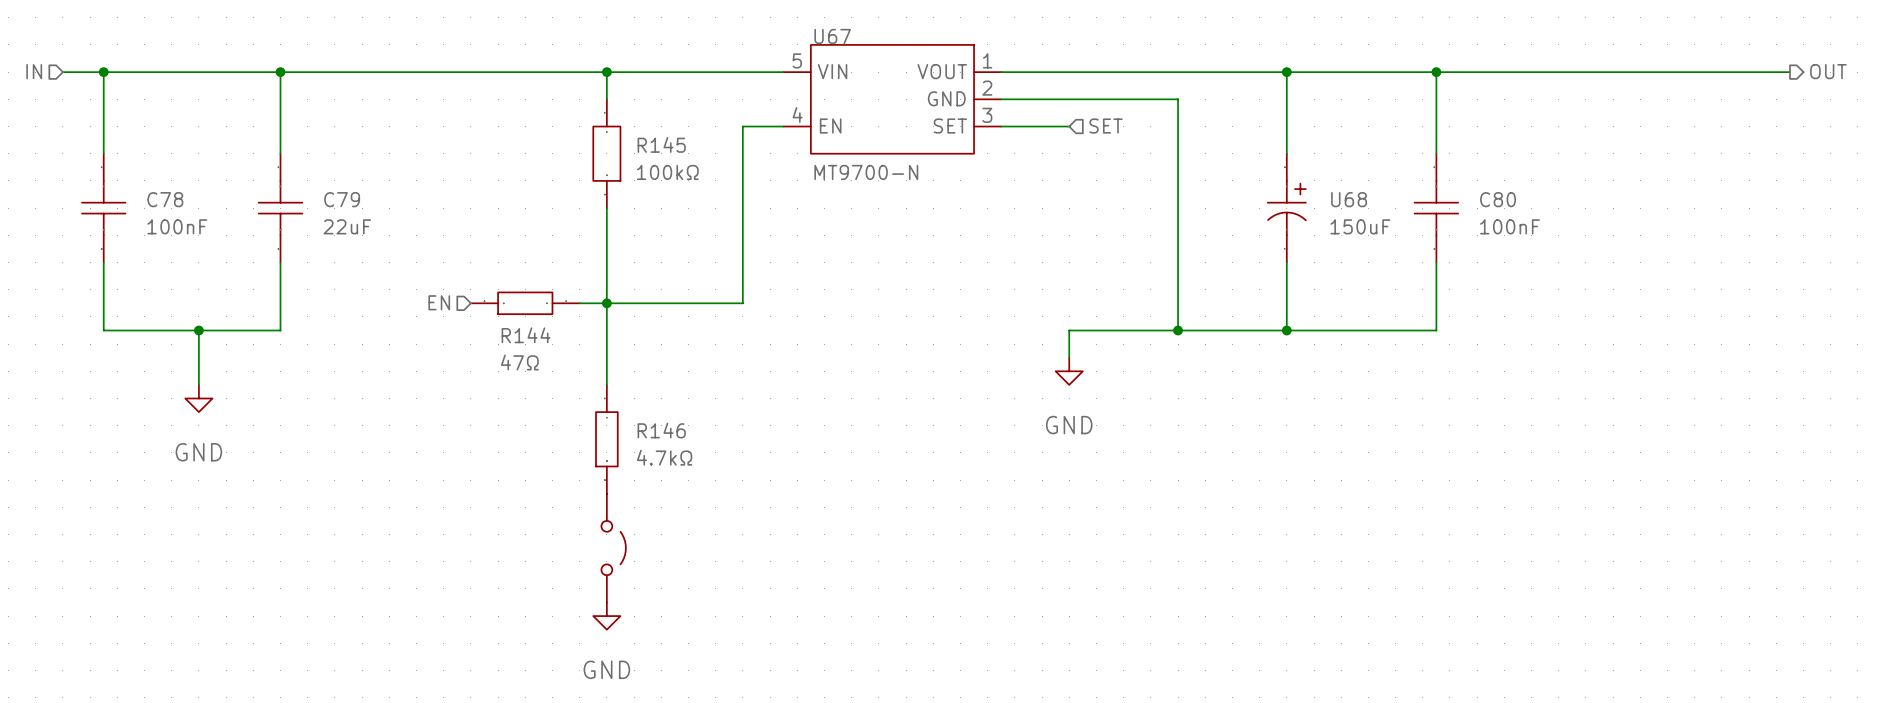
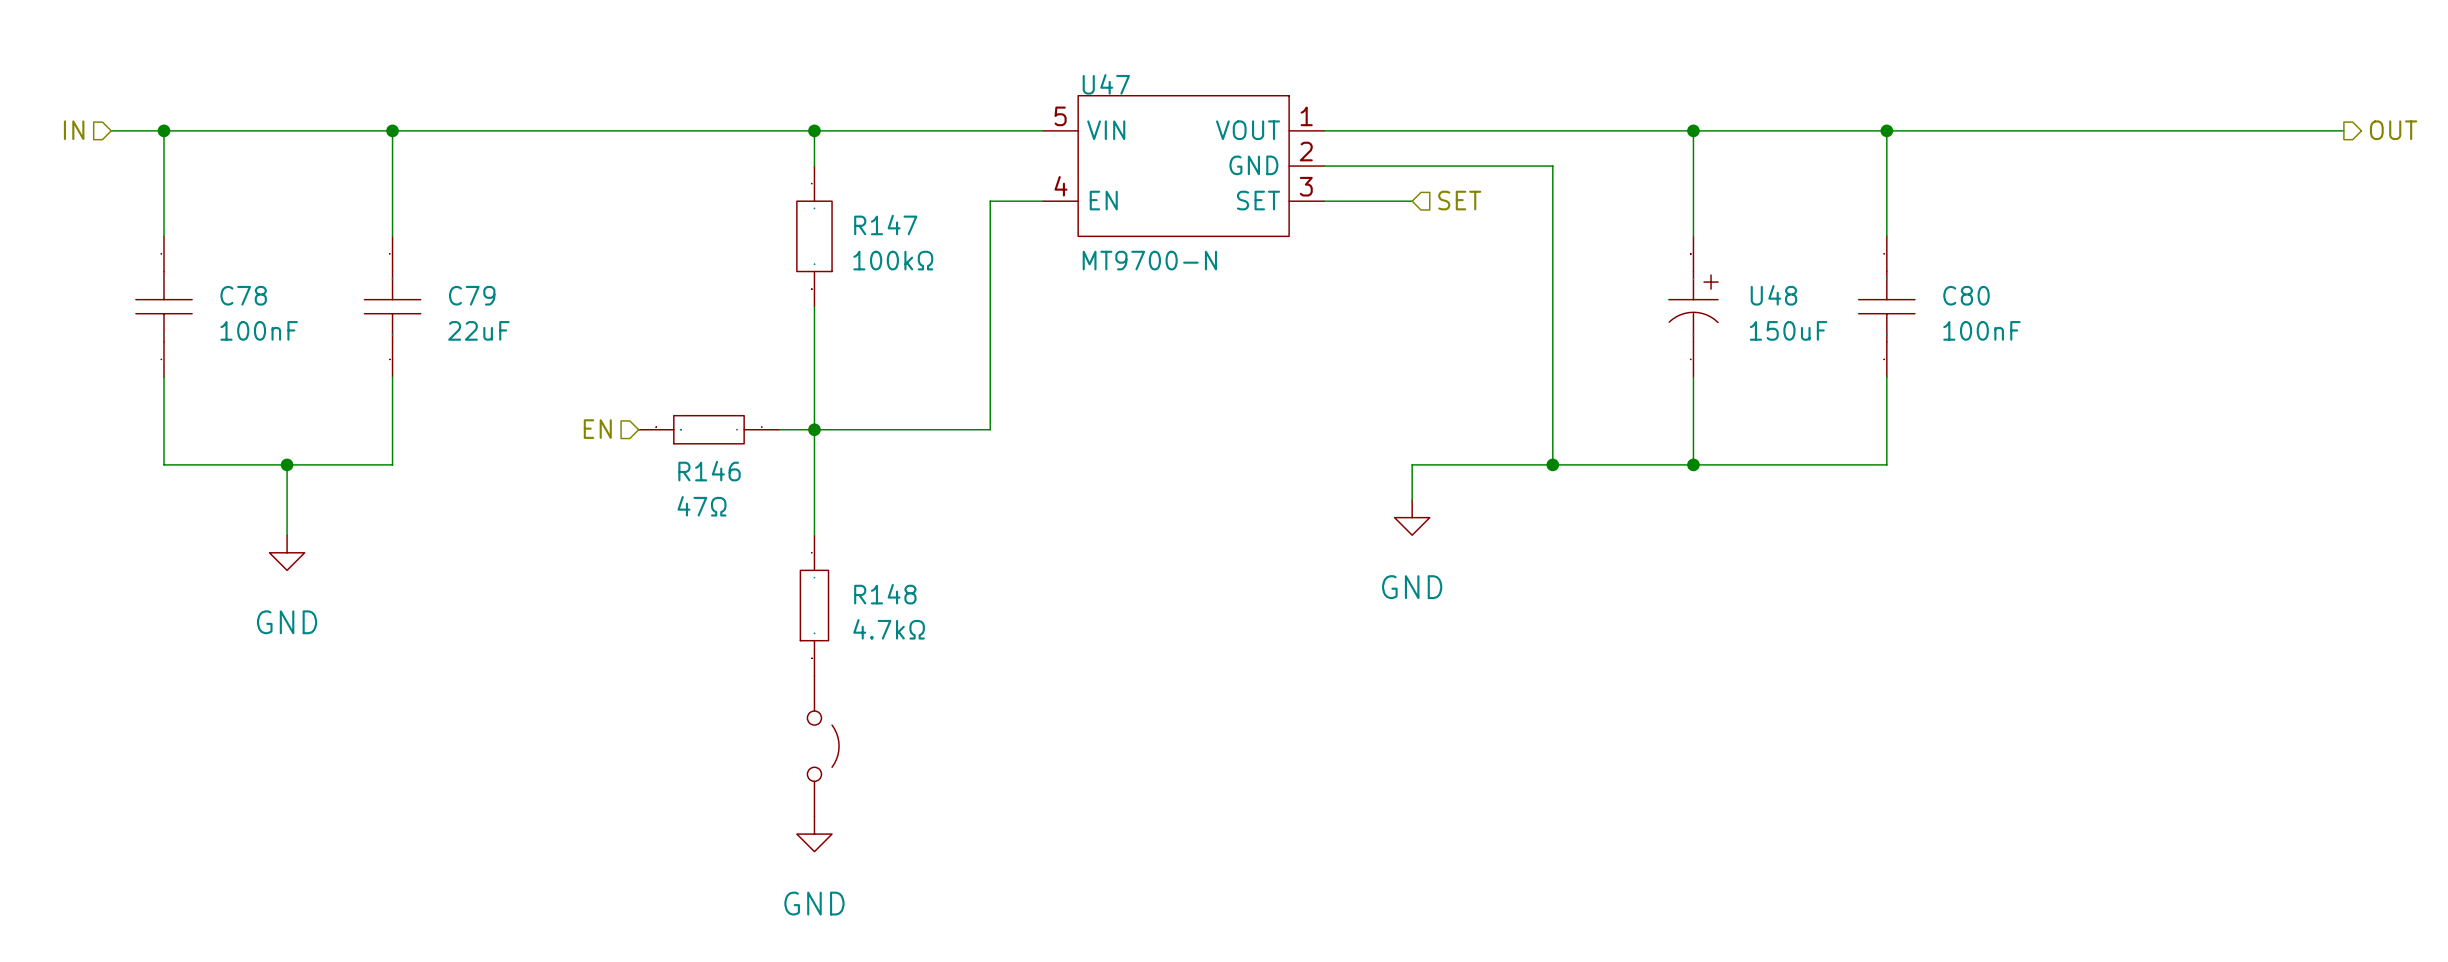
U67 name: U67 (832, 36) -> U47 (1106, 84)
R145 name: R145 (661, 144) -> R147 (885, 225)
U68 name: U68 (1349, 199) -> U48 (1773, 295)
R144 name: R144 (526, 335) -> R146 (709, 471)
R146 name: R146 (661, 430) -> R148 (885, 594)

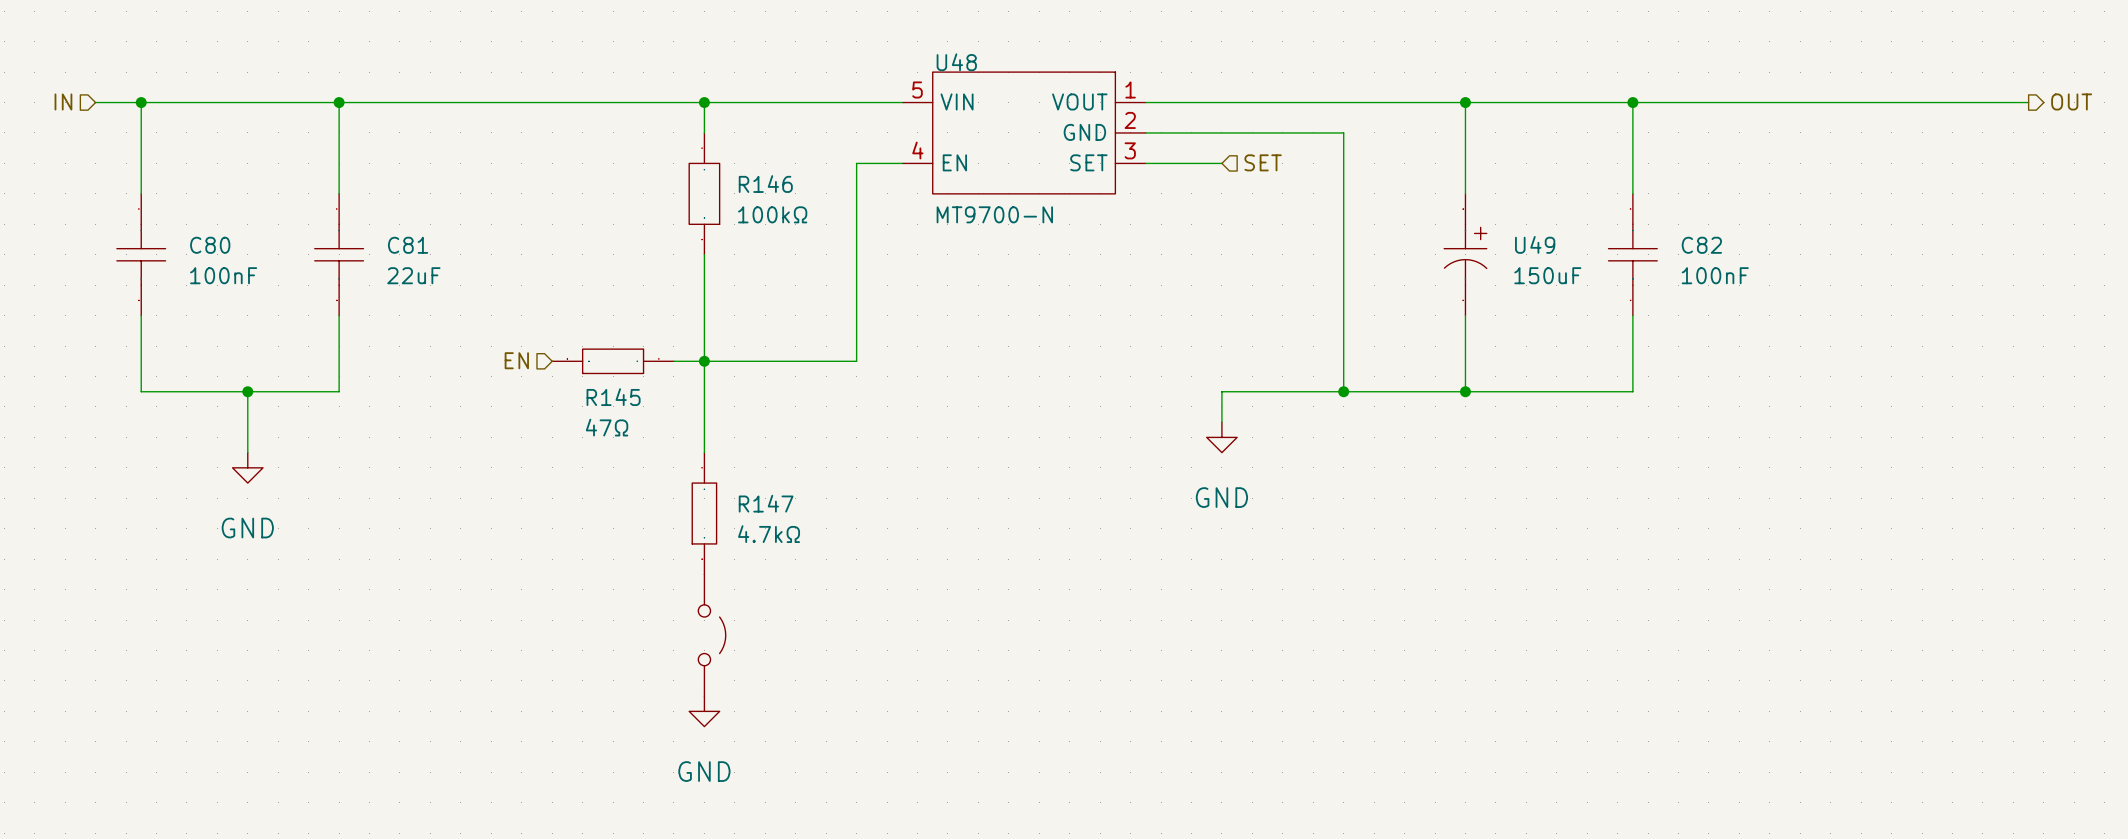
U47 name: U47 (1106, 84) -> U48 (956, 62)
R147 name: R147 (885, 225) -> R146 (765, 184)
C78 name: C78 (243, 295) -> C80 (210, 245)
C79 name: C79 (472, 295) -> C81 (408, 245)
U48 name: U48 (1773, 295) -> U49 (1535, 244)
C80 name: C80 (1966, 295) -> C82 (1701, 245)
R146 name: R146 (709, 471) -> R145 (613, 397)
R148 name: R148 (885, 594) -> R147 (766, 503)

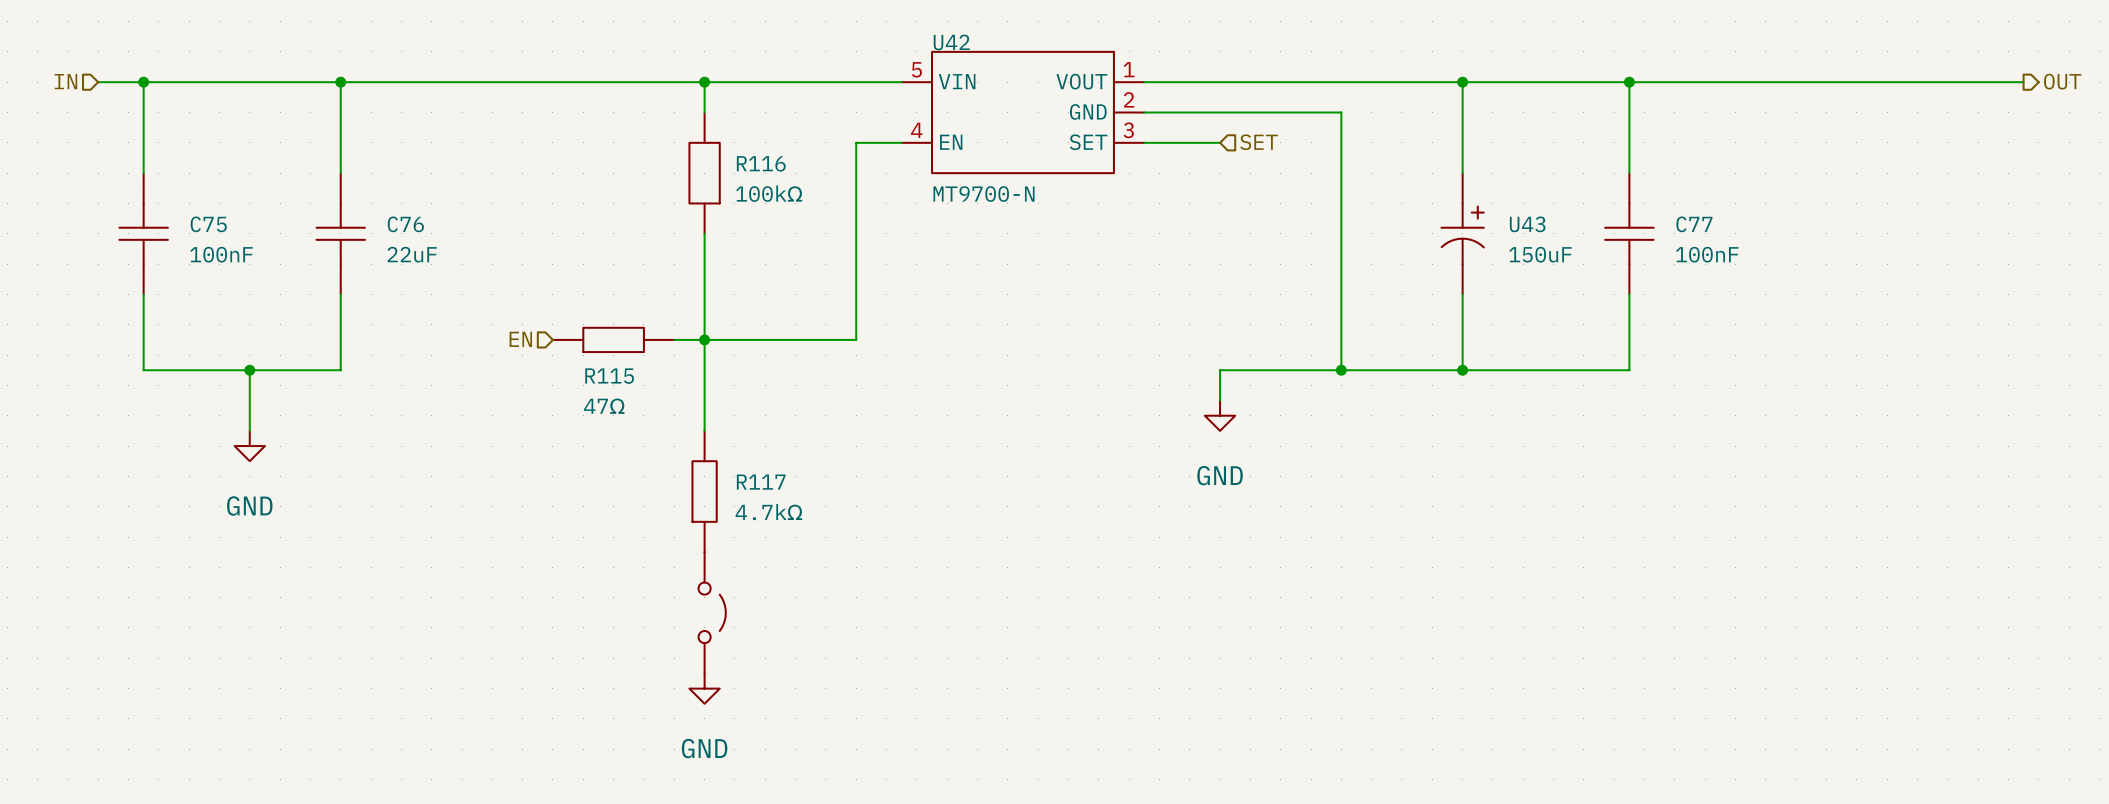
U48 name: U48 (956, 62) -> U42 (951, 42)
R146 name: R146 (765, 184) -> R116 (761, 163)
U49 name: U49 (1535, 244) -> U43 (1527, 224)
C80 name: C80 (210, 245) -> C75 (208, 224)
C81 name: C81 (408, 245) -> C76 (405, 224)
C82 name: C82 (1701, 245) -> C77 (1694, 224)
R145 name: R145 (613, 397) -> R115 (609, 376)
R147 name: R147 (766, 503) -> R117 (761, 482)

